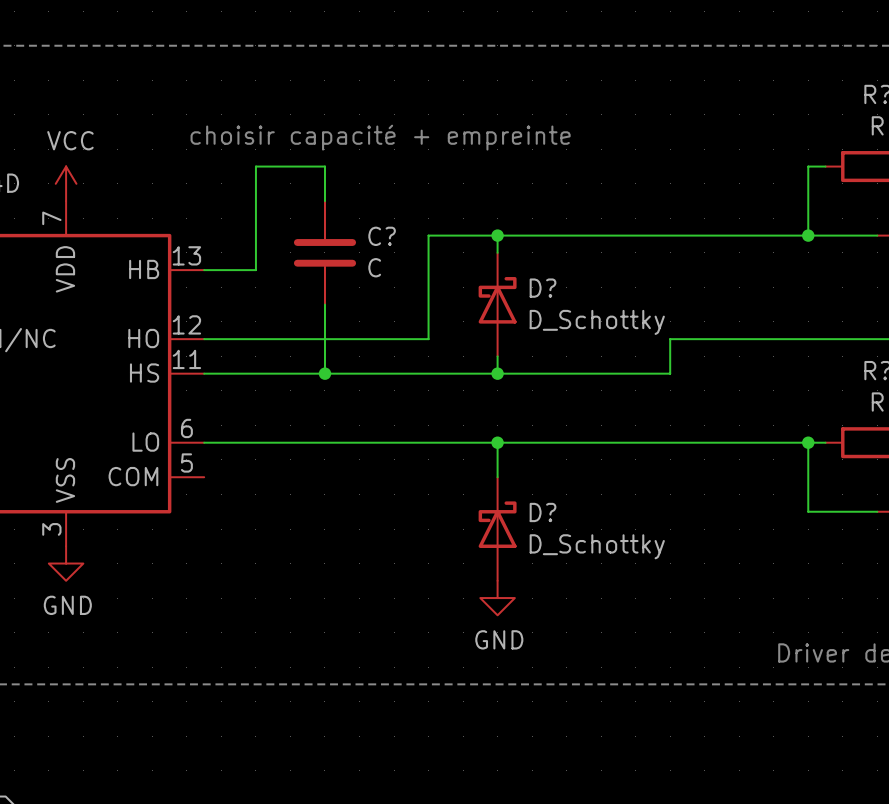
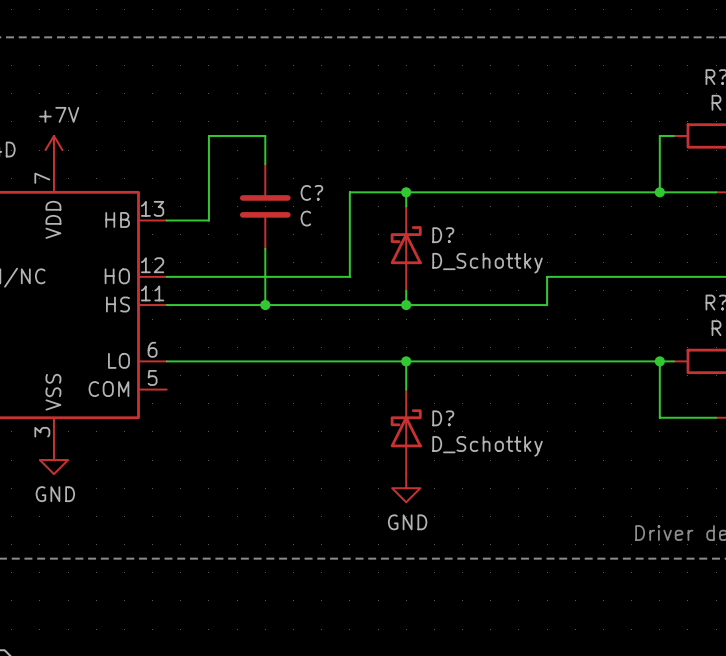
text: choisir capacité + empreinte (380, 137) -> none
power symbol: VCC (66, 183) -> +7V (53, 150)

